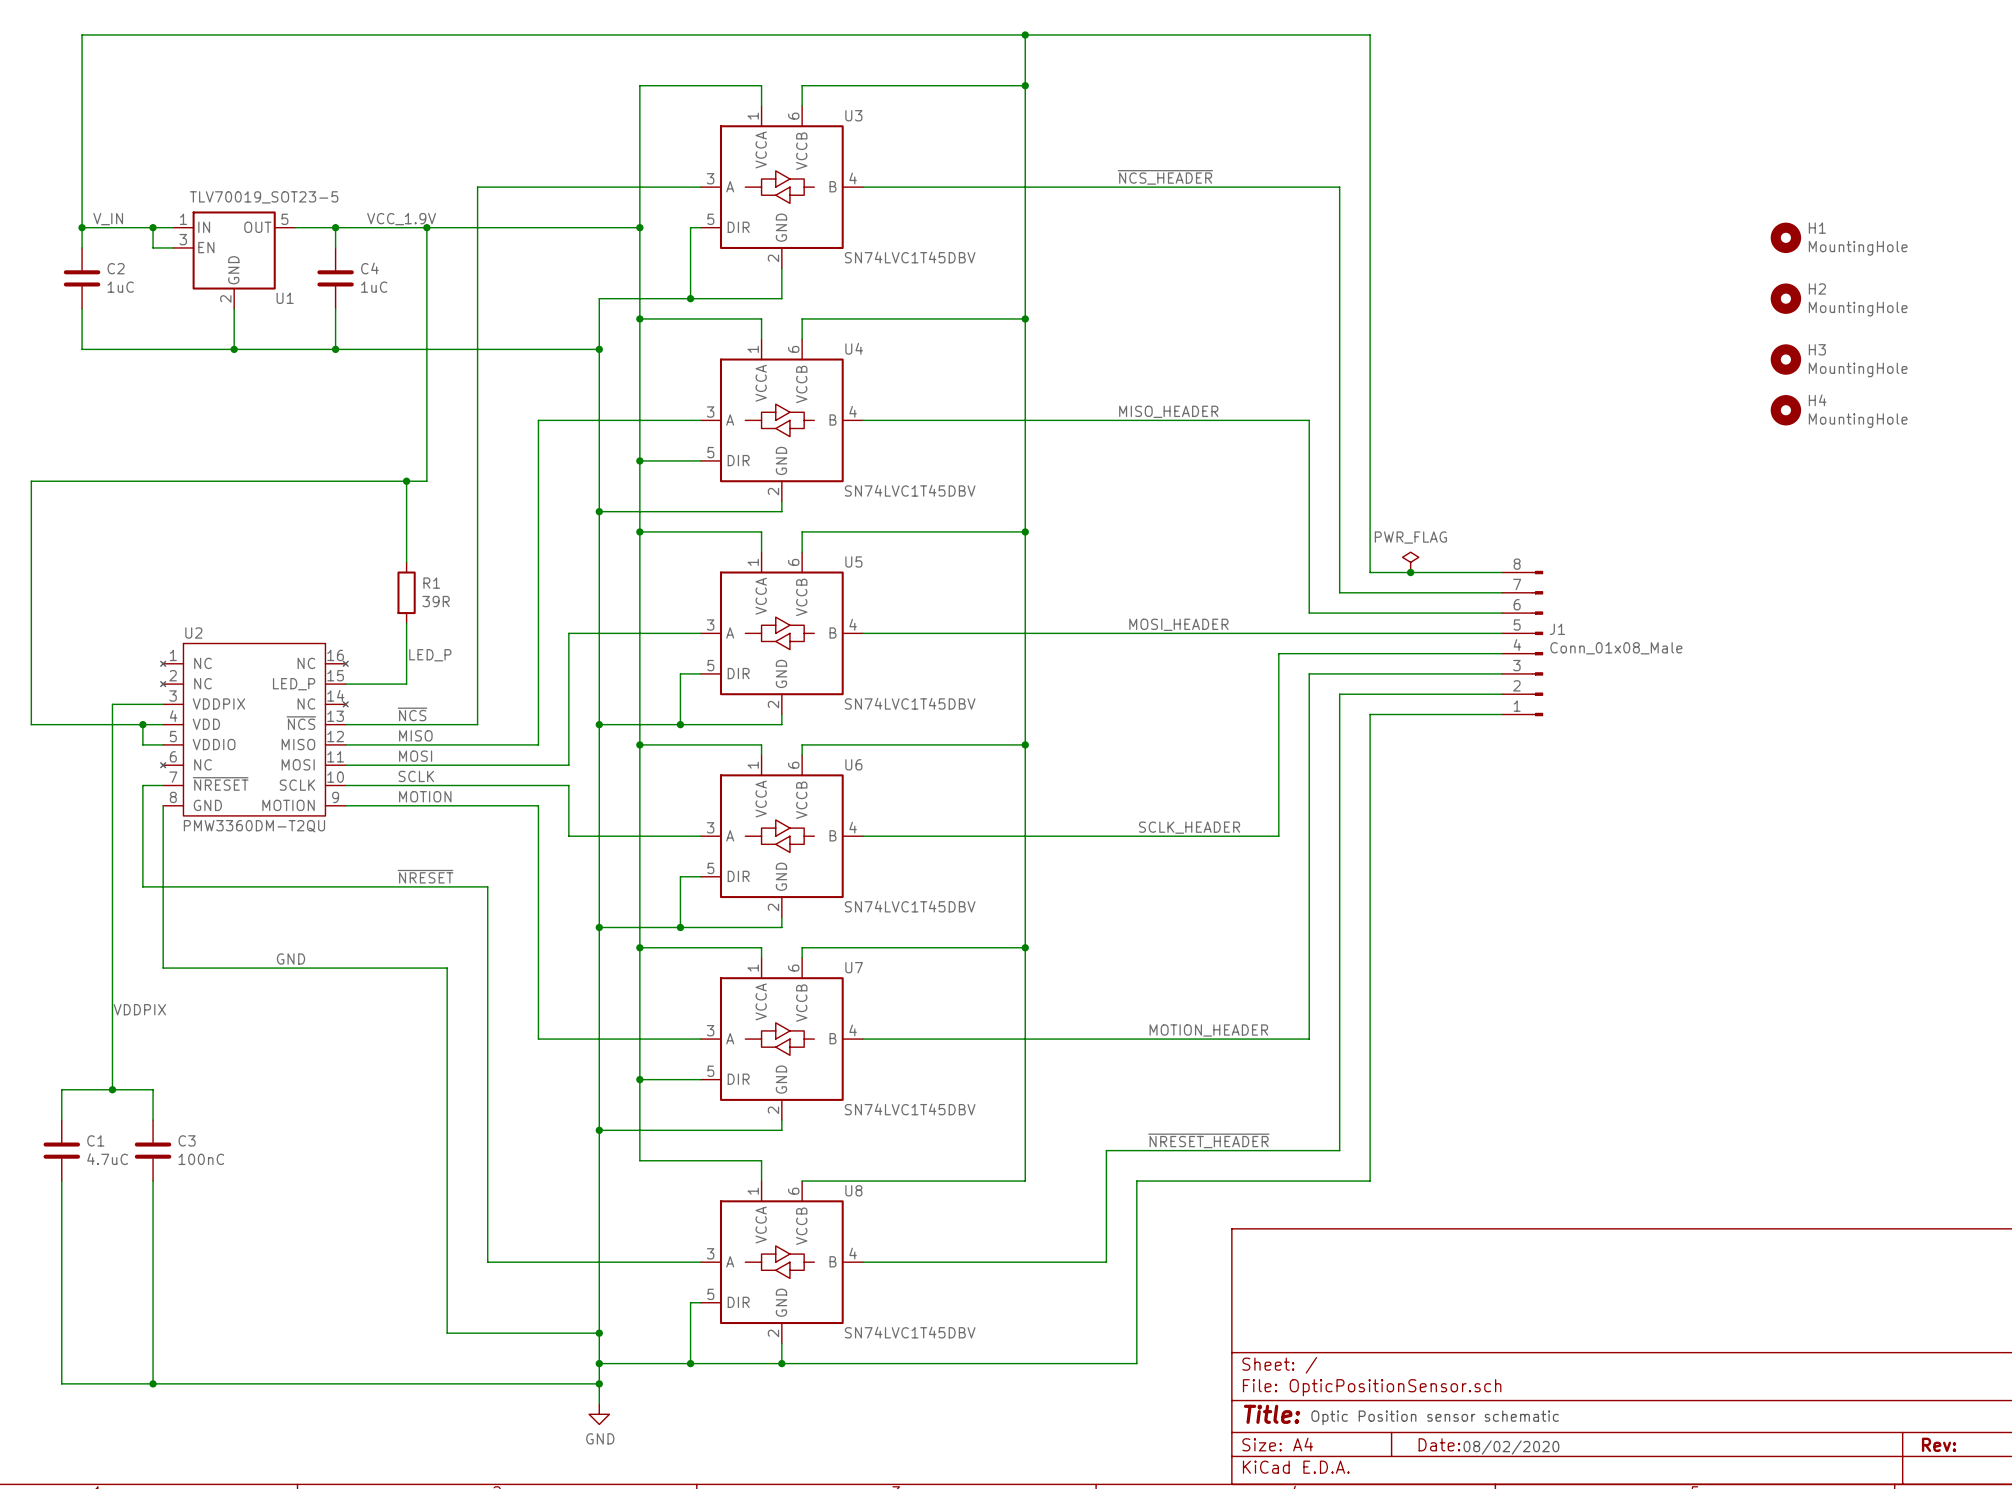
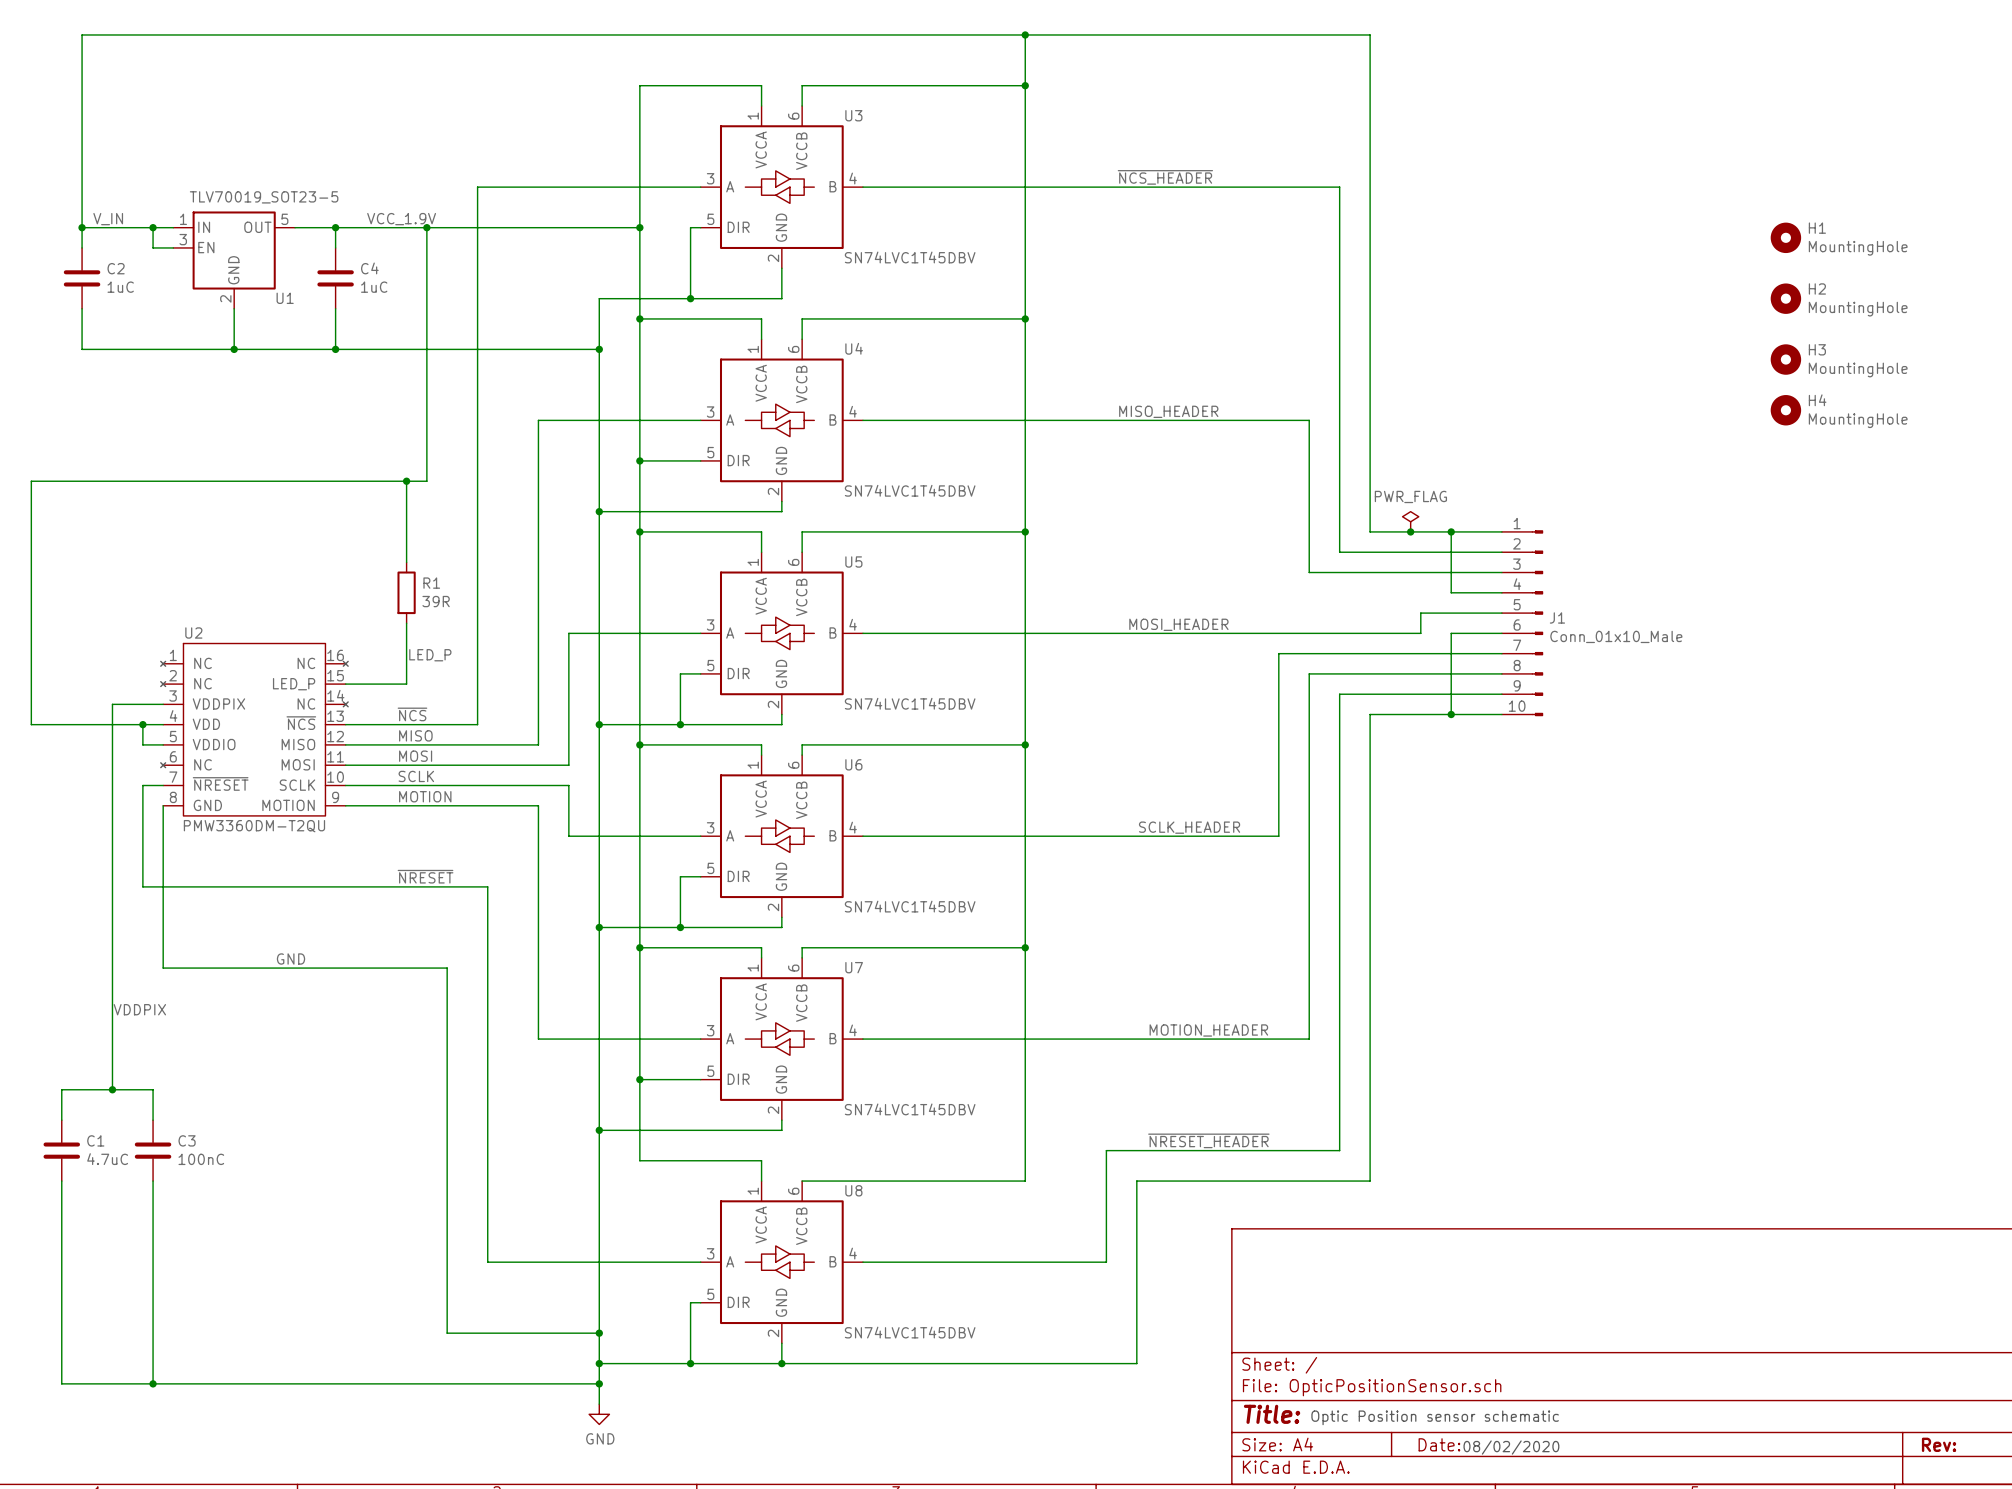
wire: (1370, 531) (1370, 572) -> (1370, 531) (1501, 531)
junction: none -> (1410, 531)
wire: none -> (1451, 531) (1451, 592)
junction: none -> (1451, 531)
wire: (1339, 552) (1339, 592) (1451, 592) -> (1339, 552) (1501, 552)
power symbol position: PWR_FLAG (1410, 562) -> PWR_FLAG (1410, 521)
J1 symbol: [1501, 570, 1544, 717] -> [1501, 530, 1544, 717]
wire: (1309, 572) (1309, 613) (1420, 613) -> (1309, 572) (1370, 572)
junction: (1410, 572) -> none
wire: (1420, 633) (1451, 633) -> (1420, 633) (1420, 613)
wire: none -> (1451, 633) (1451, 714)
J1 value: Conn_01x08_Male (1616, 648) -> Conn_01x10_Male (1616, 636)
junction: none -> (1451, 714)

